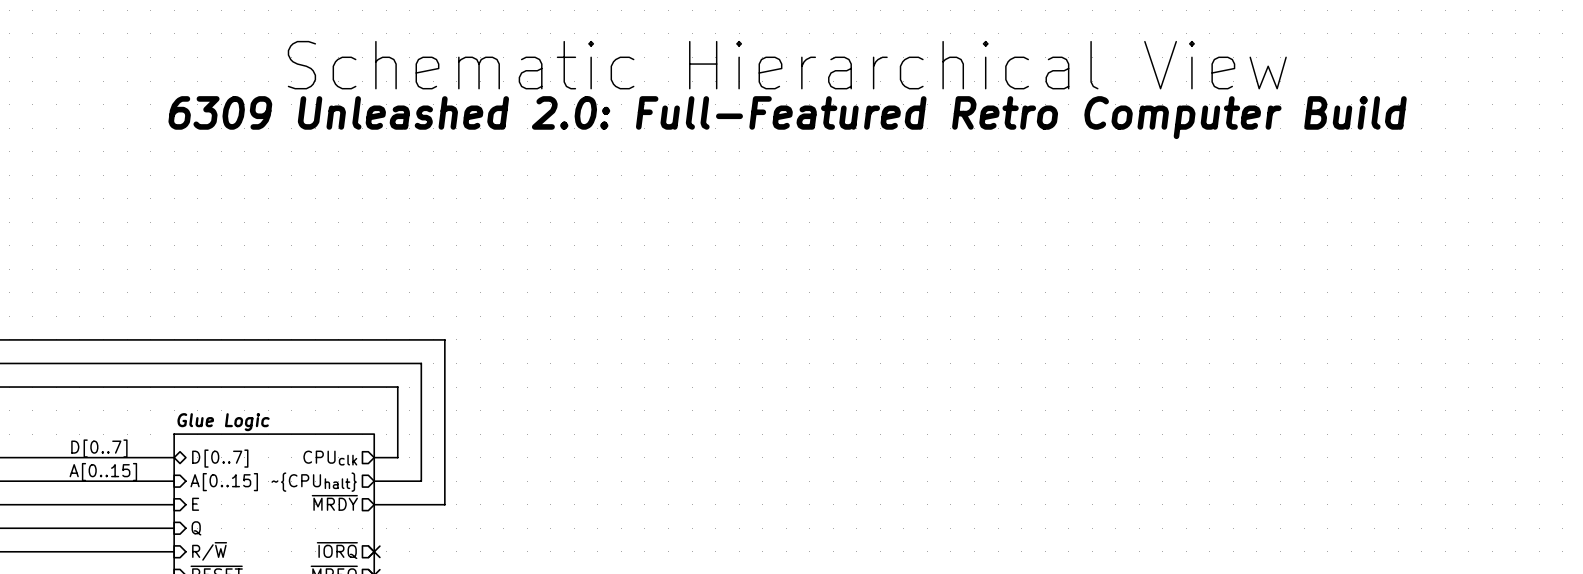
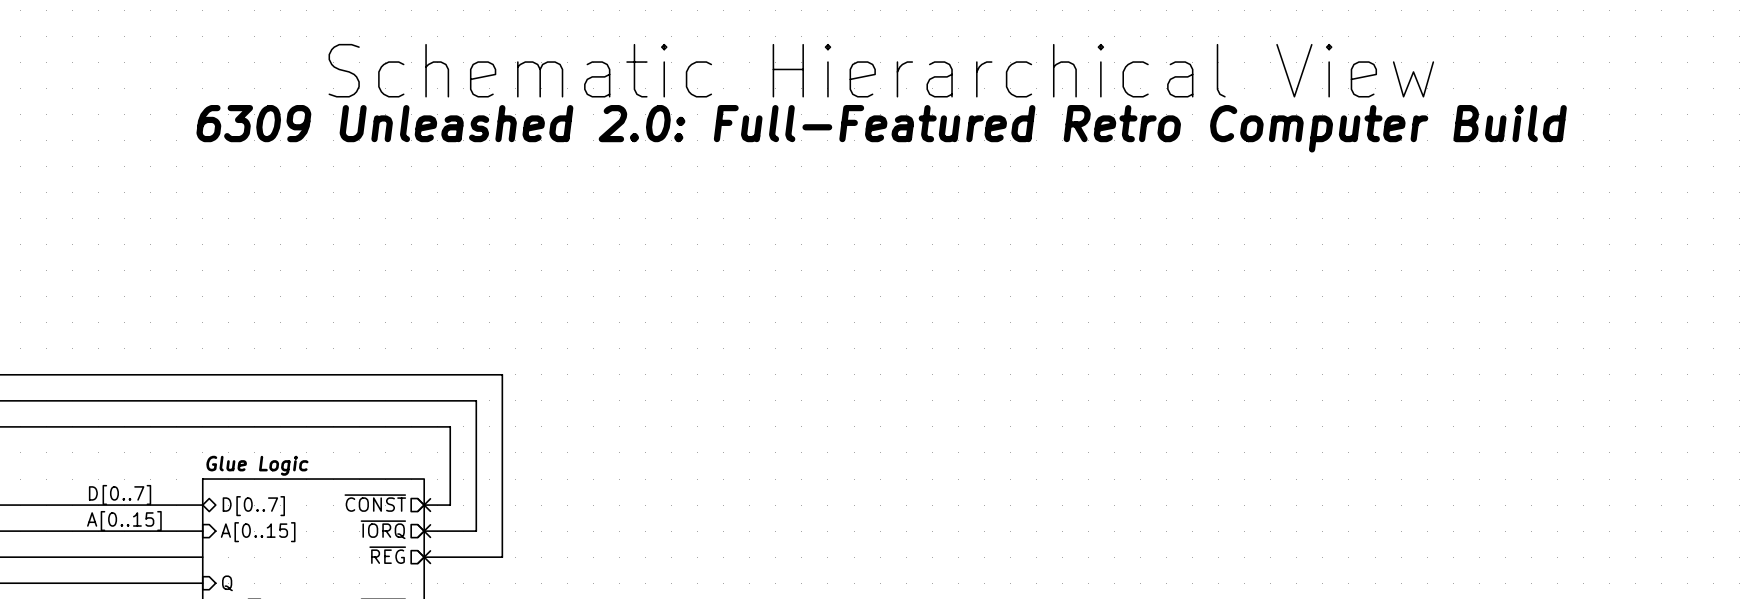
no-connect mark: none -> (424, 505)
sheet pin: CPUclk (330, 458) -> ~{CONST} (375, 503)
no-connect mark: none -> (424, 531)
sheet pin: ~{CPUhalt} (314, 482) -> ~{IORQ} (383, 529)
sheet pin: ~{MRDY} (334, 502) -> ~{REG} (387, 555)
sheet pin: E (195, 504) -> none
no-connect mark: none -> (424, 557)

